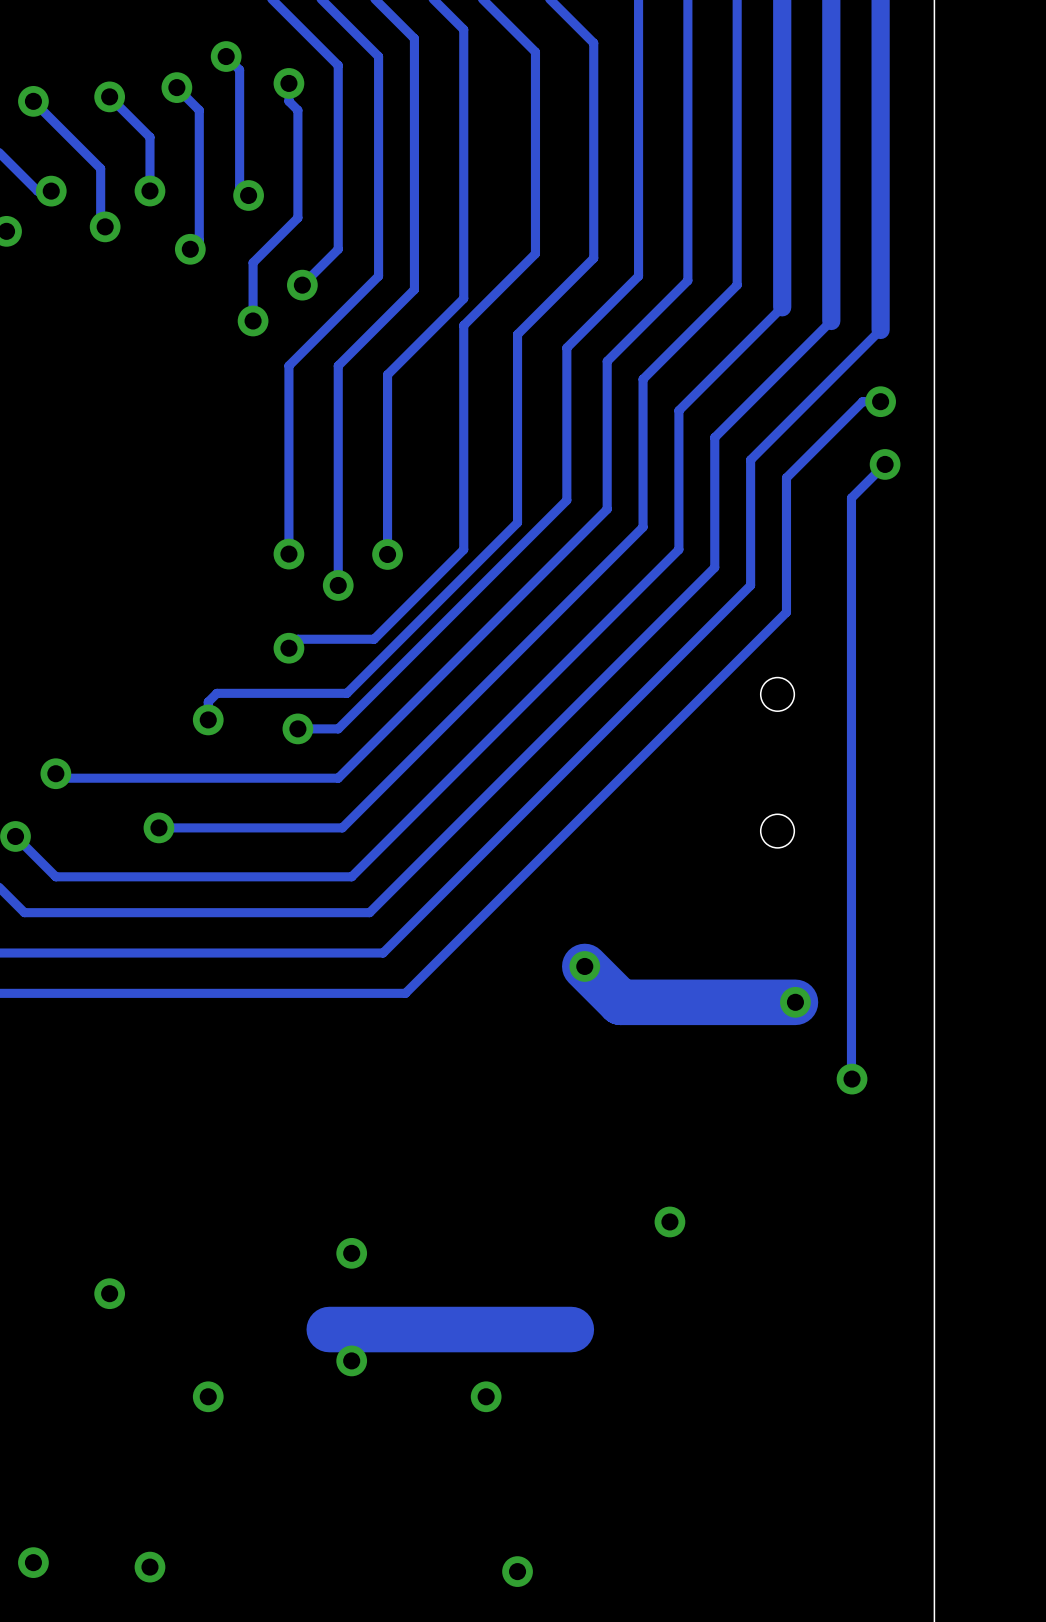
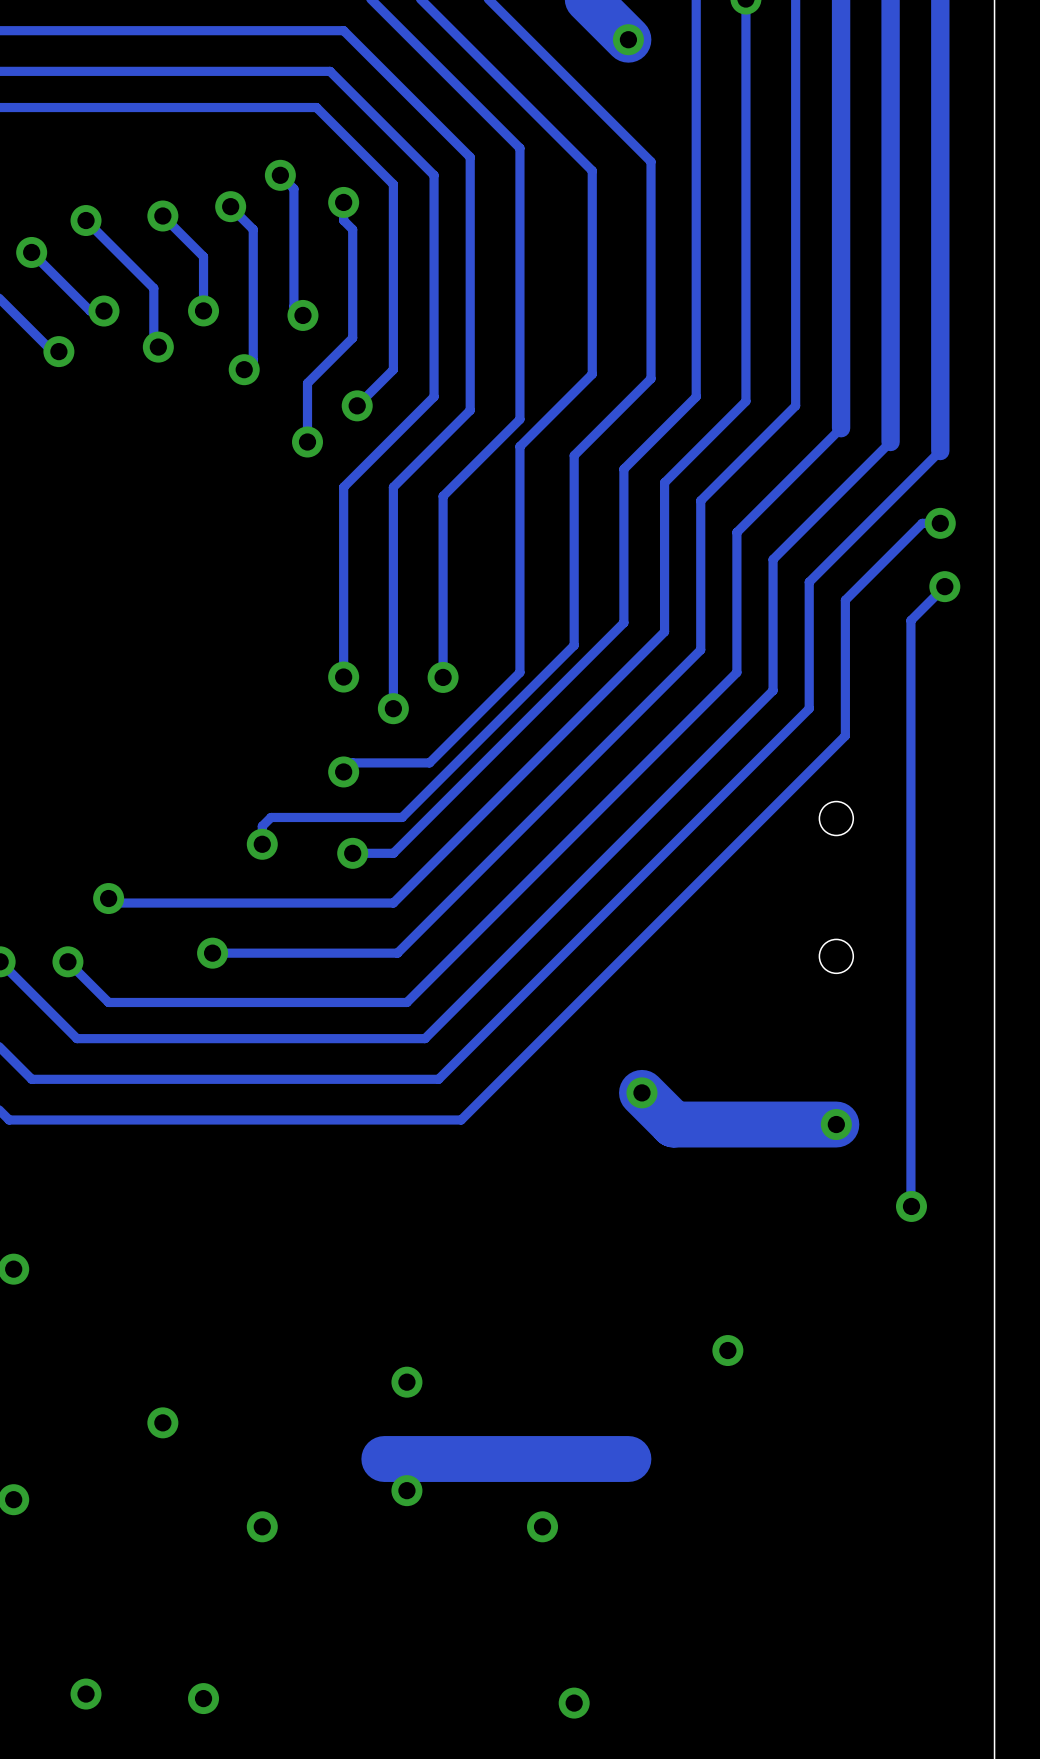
track: (616, 997) (620, 1002) (795, 1002) -> (673, 1124) (836, 1124)
via position: (795, 1002) -> (836, 1124)

